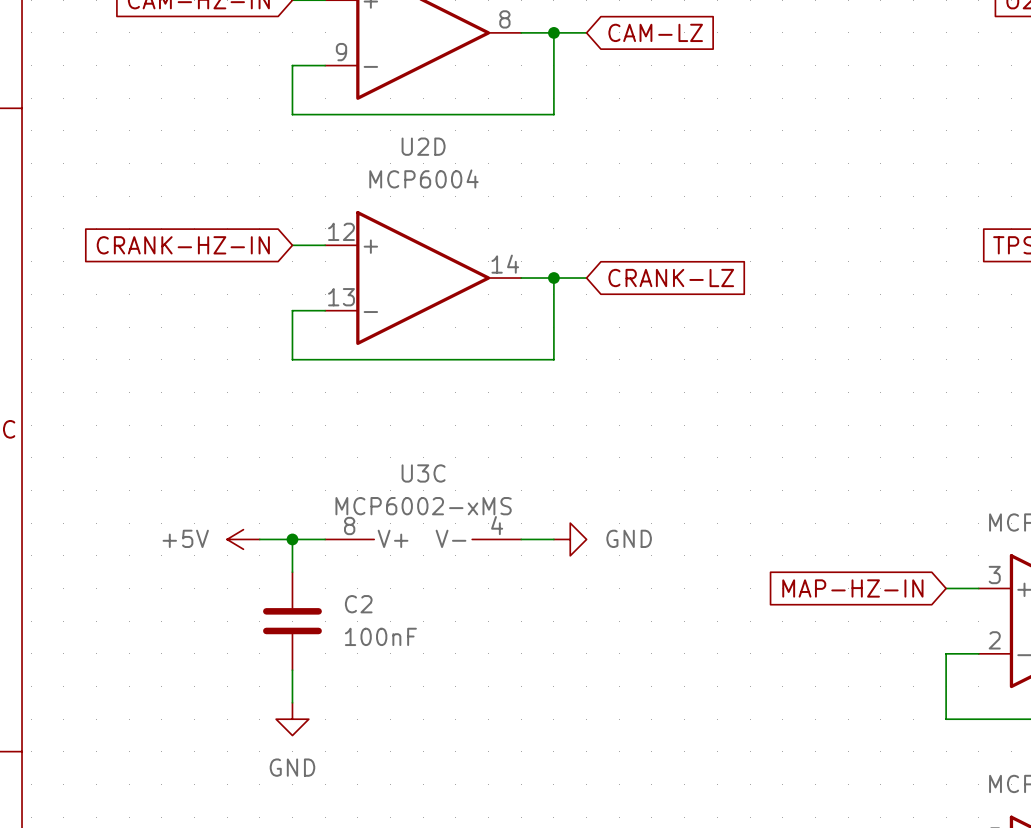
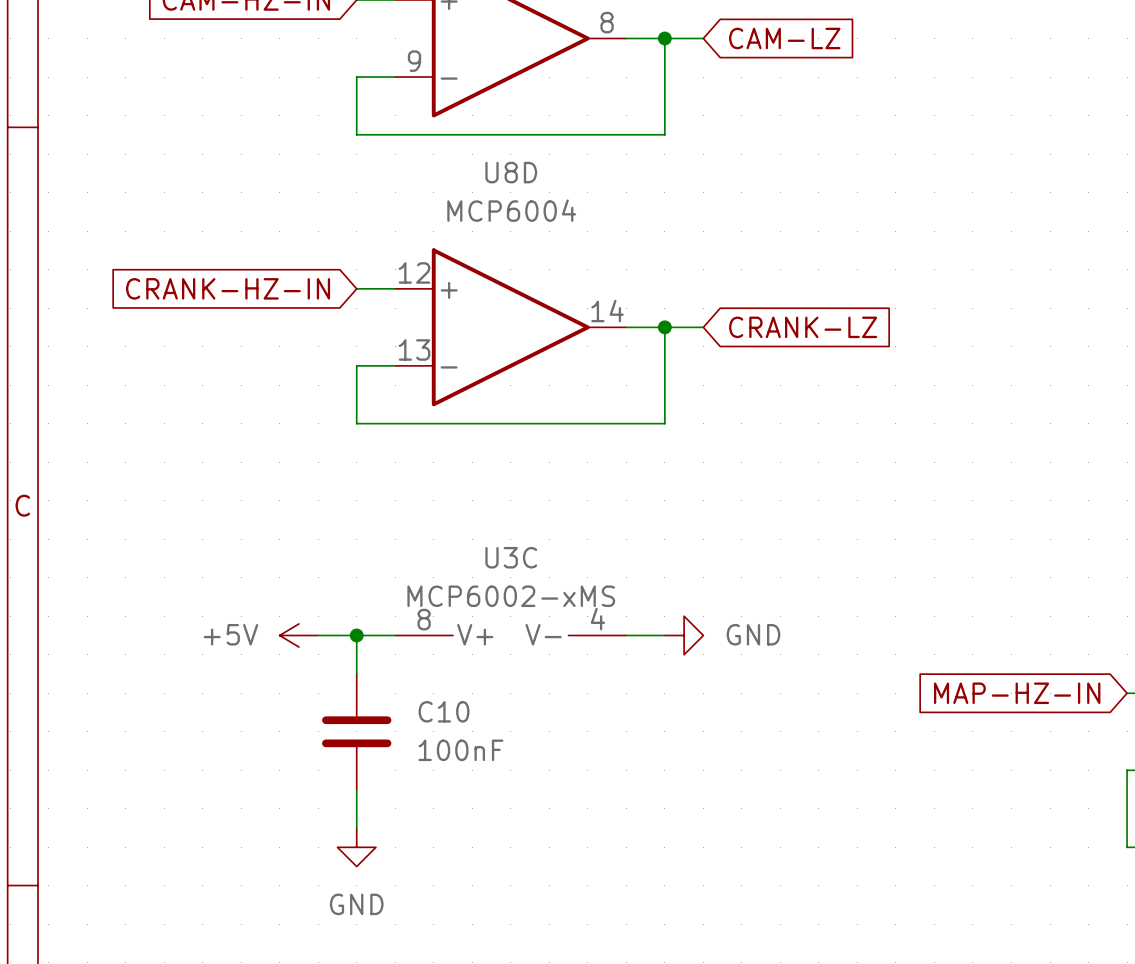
U2D name: U2D (423, 146) -> U8D (511, 172)
C2 name: C2 (358, 604) -> C10 (443, 711)

